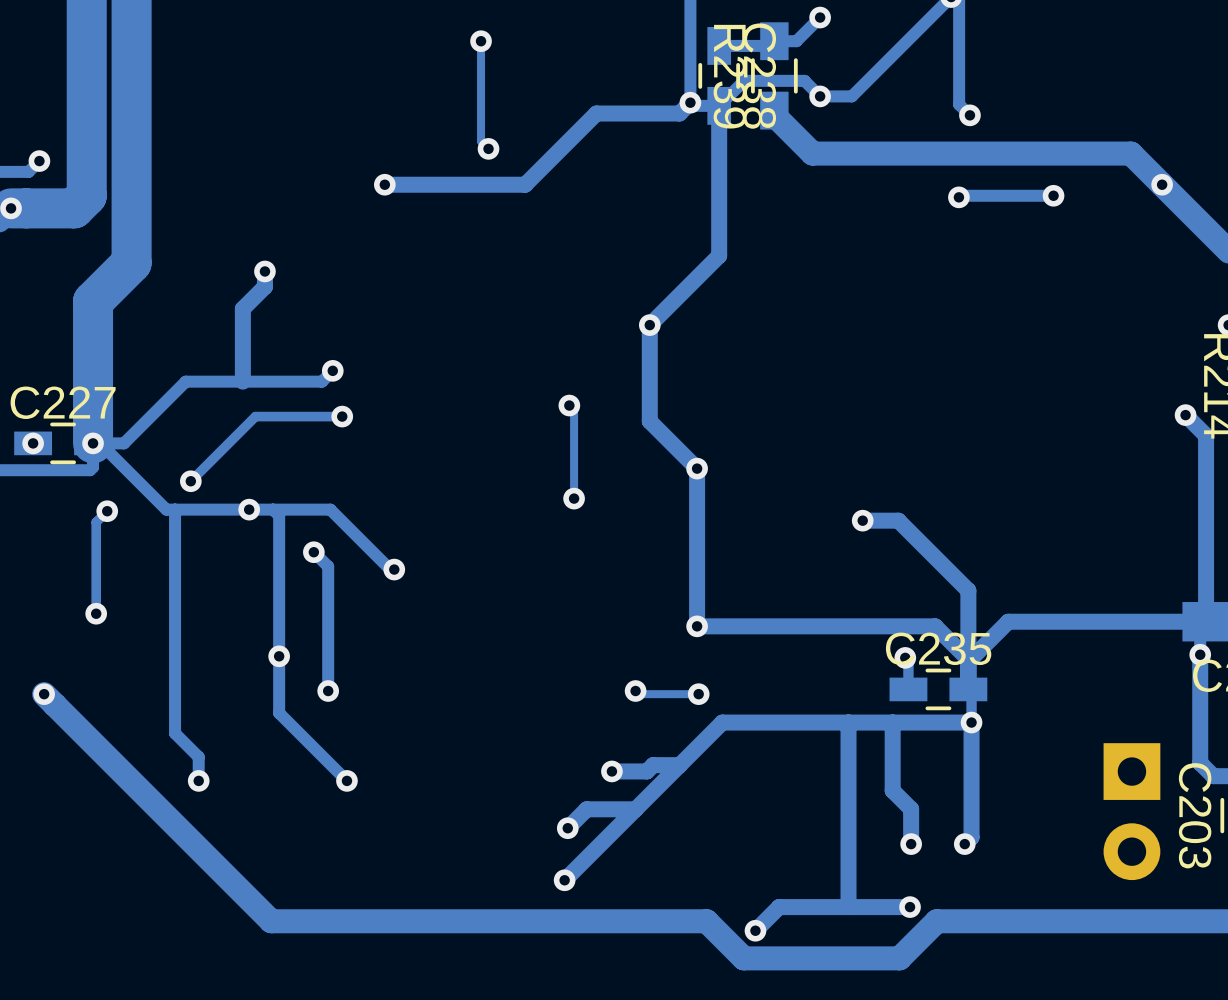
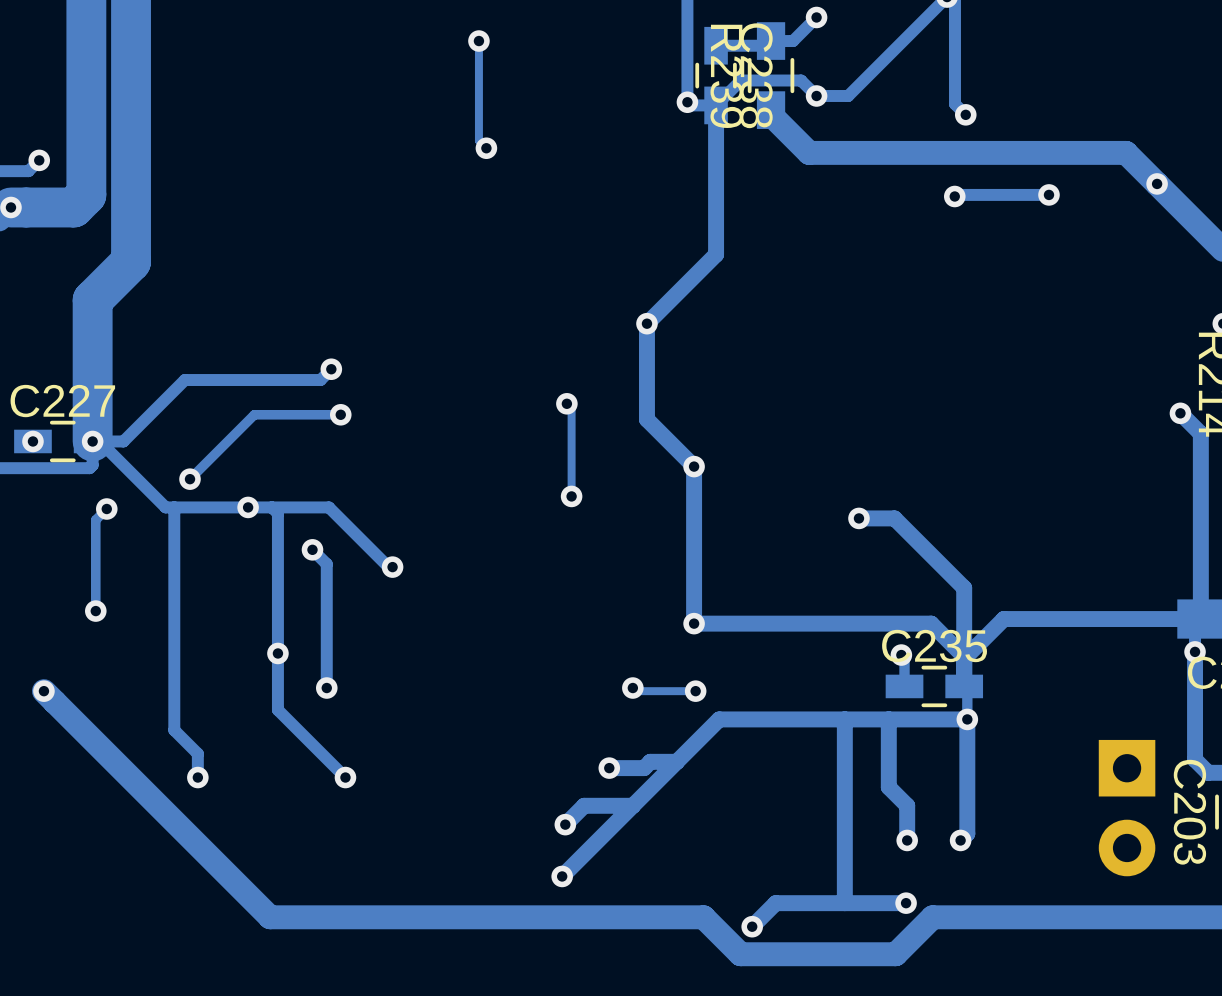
track: (690, 102) (679, 113) (596, 113) (525, 184) (384, 184) -> none
via: (384, 184) -> none
track: (264, 271) (264, 286) (242, 308) (242, 381) -> none
via: (264, 271) -> none

